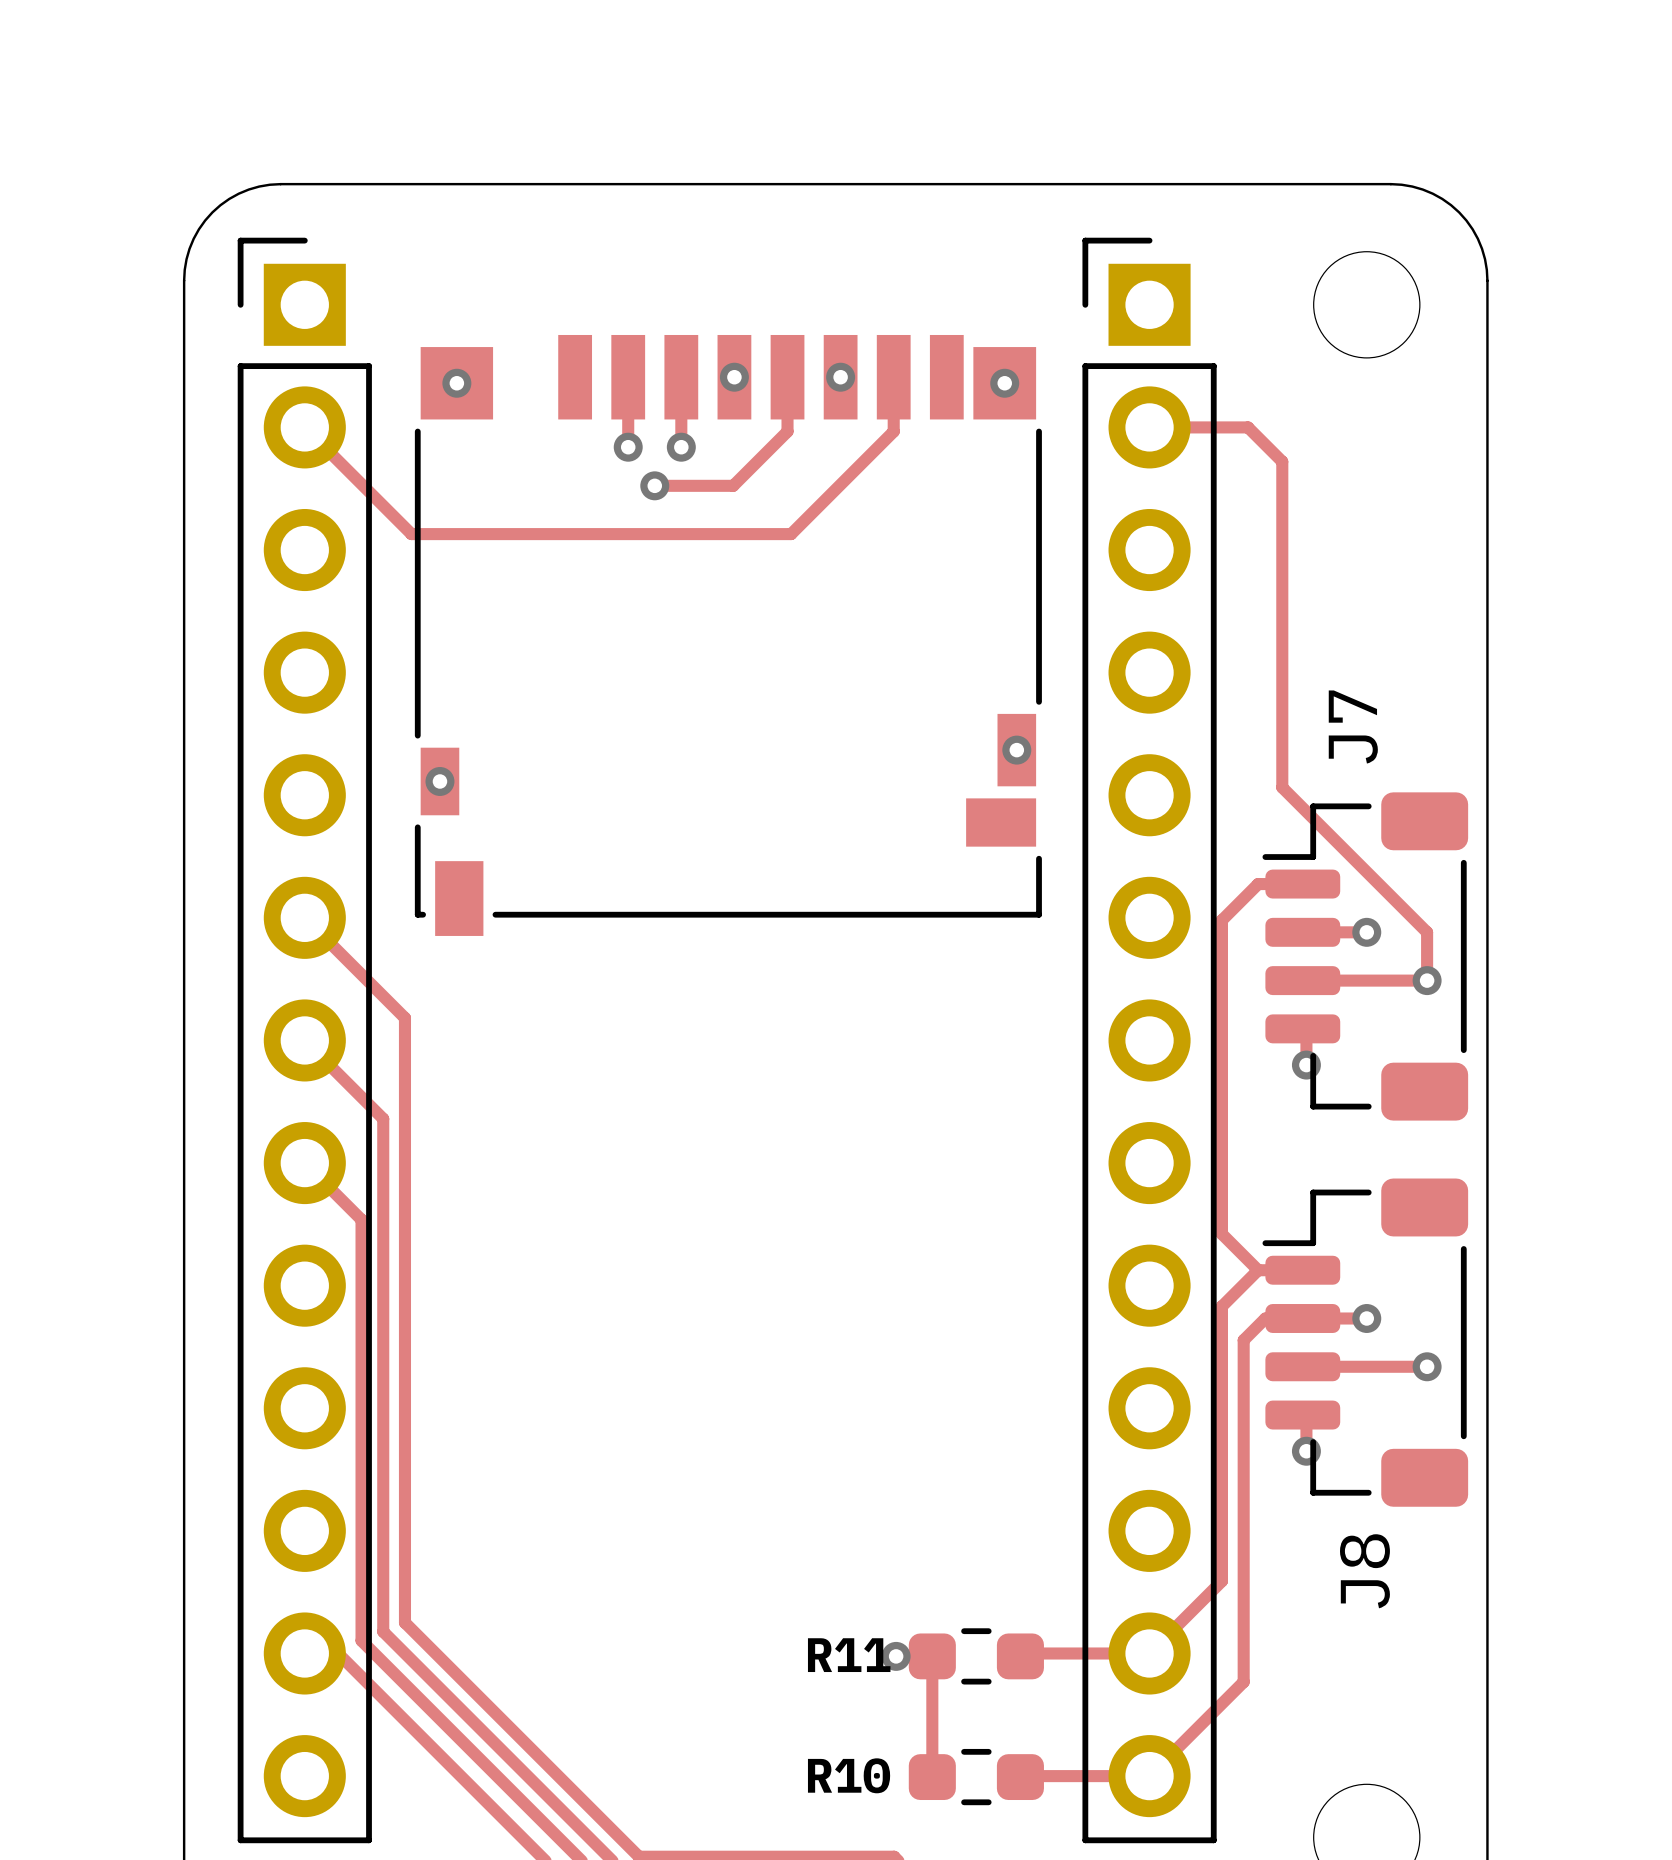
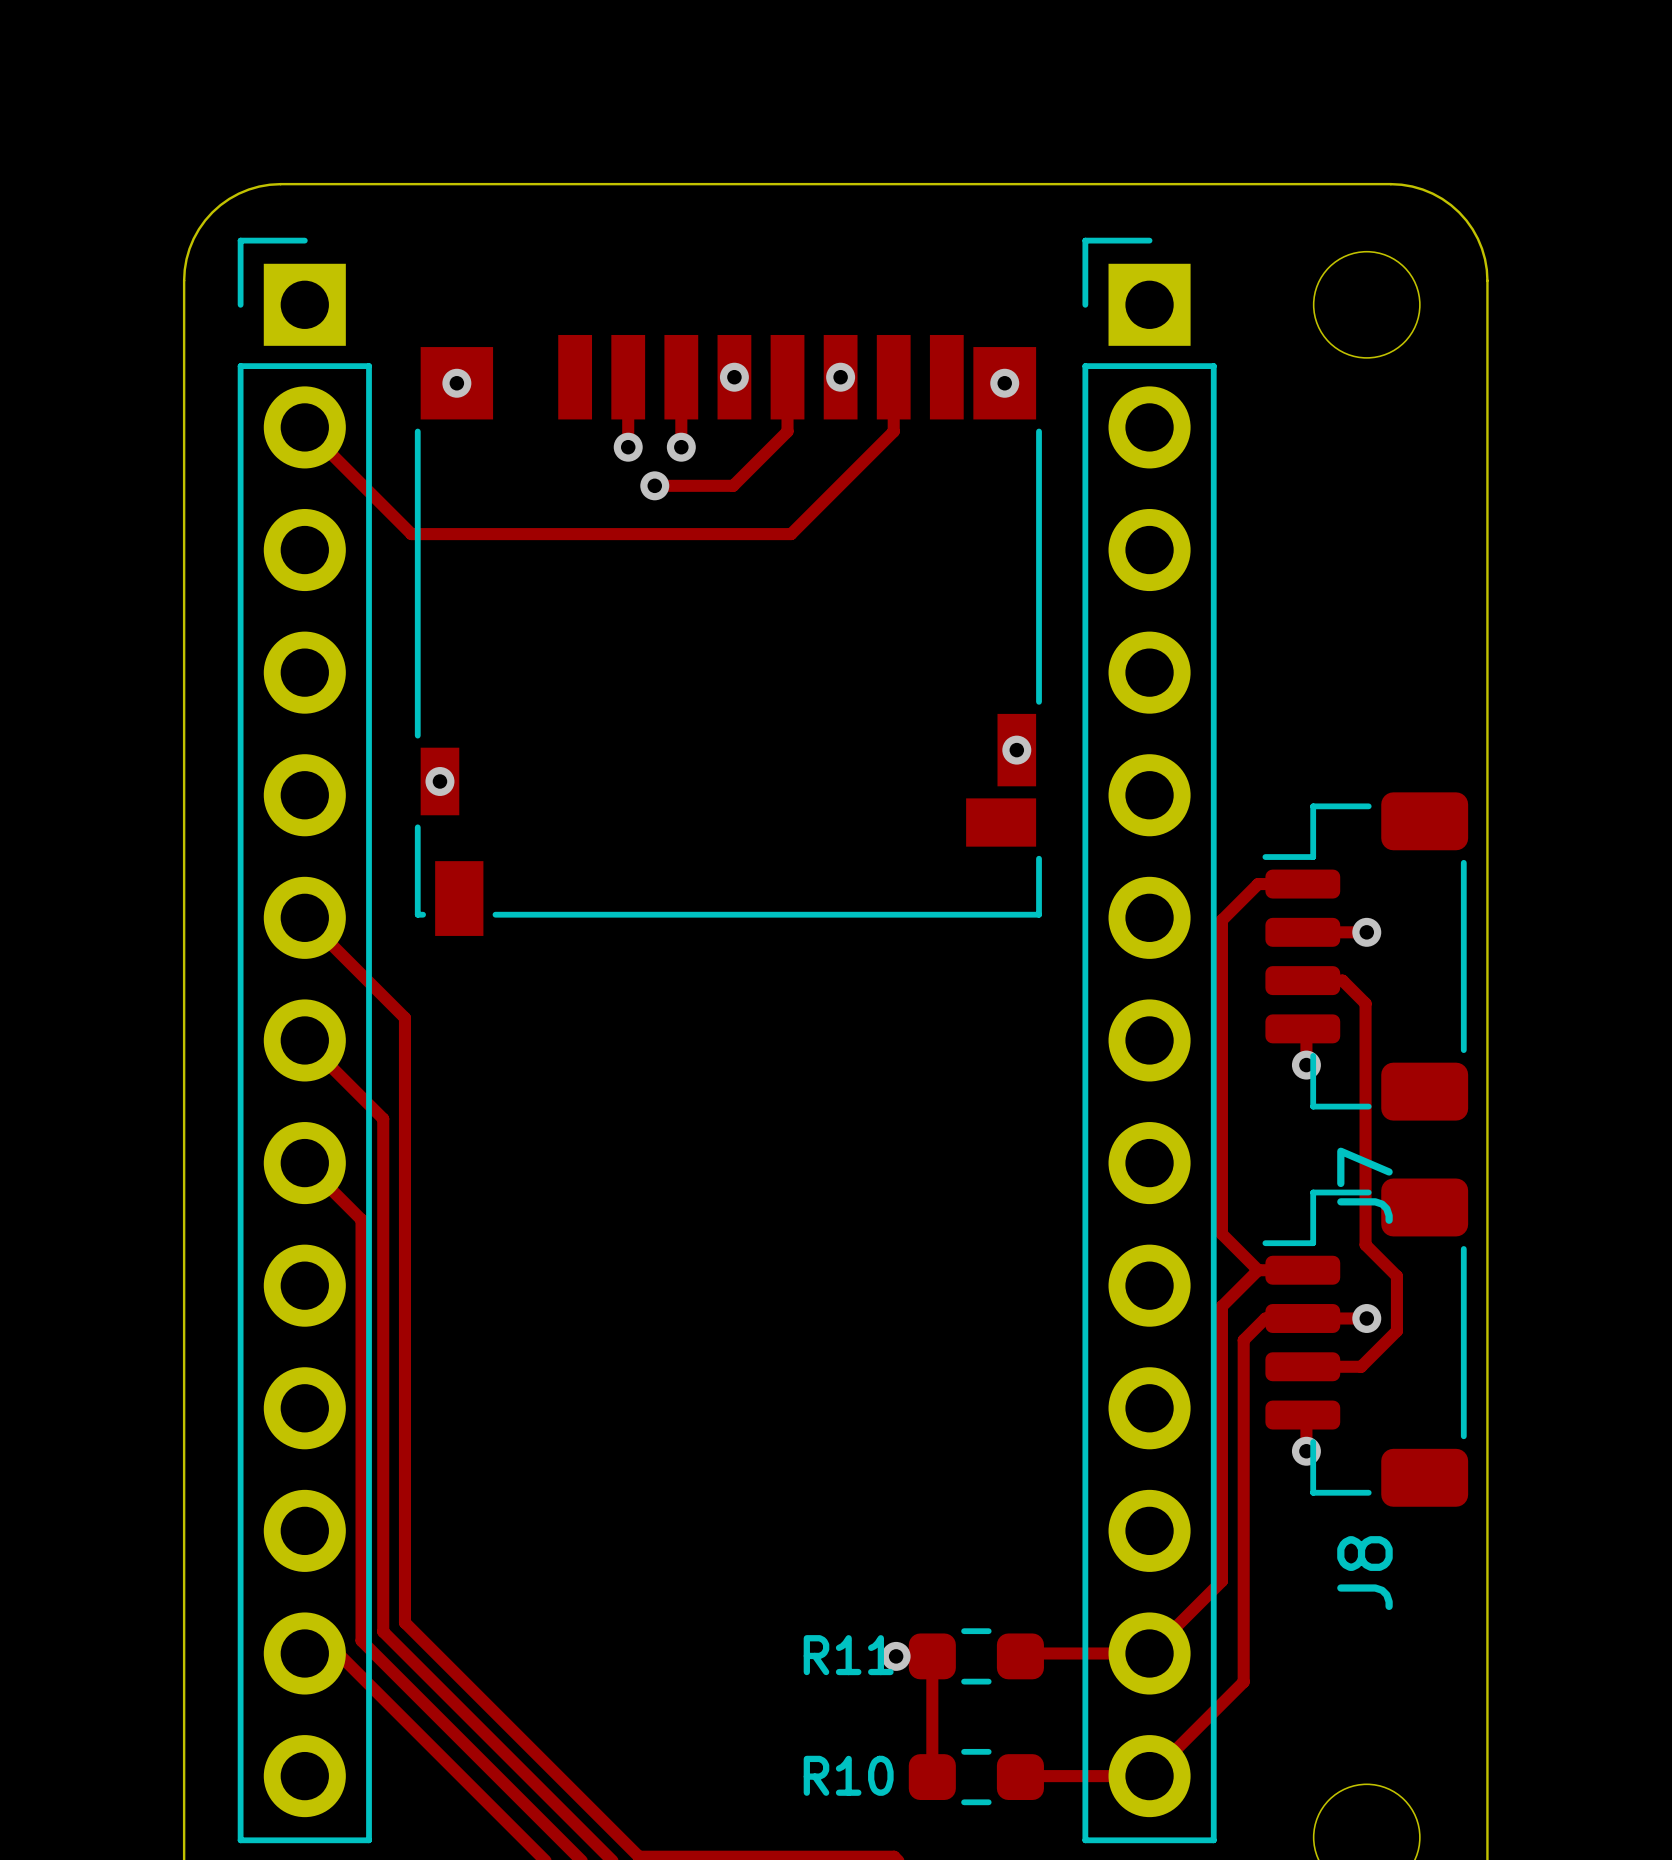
track: (1149, 427) (1248, 427) (1282, 461) (1282, 787) (1427, 932) (1427, 980) (1342, 980) -> none
J7 name position: J7 (1353, 727) -> J7 (1364, 1185)
via: (1427, 980) -> none
track: (1361, 1366) (1427, 1366) -> (1361, 1366) (1396, 1330) (1396, 1276) (1365, 1244) (1365, 1003) (1342, 980)
via: (1427, 1366) -> none

